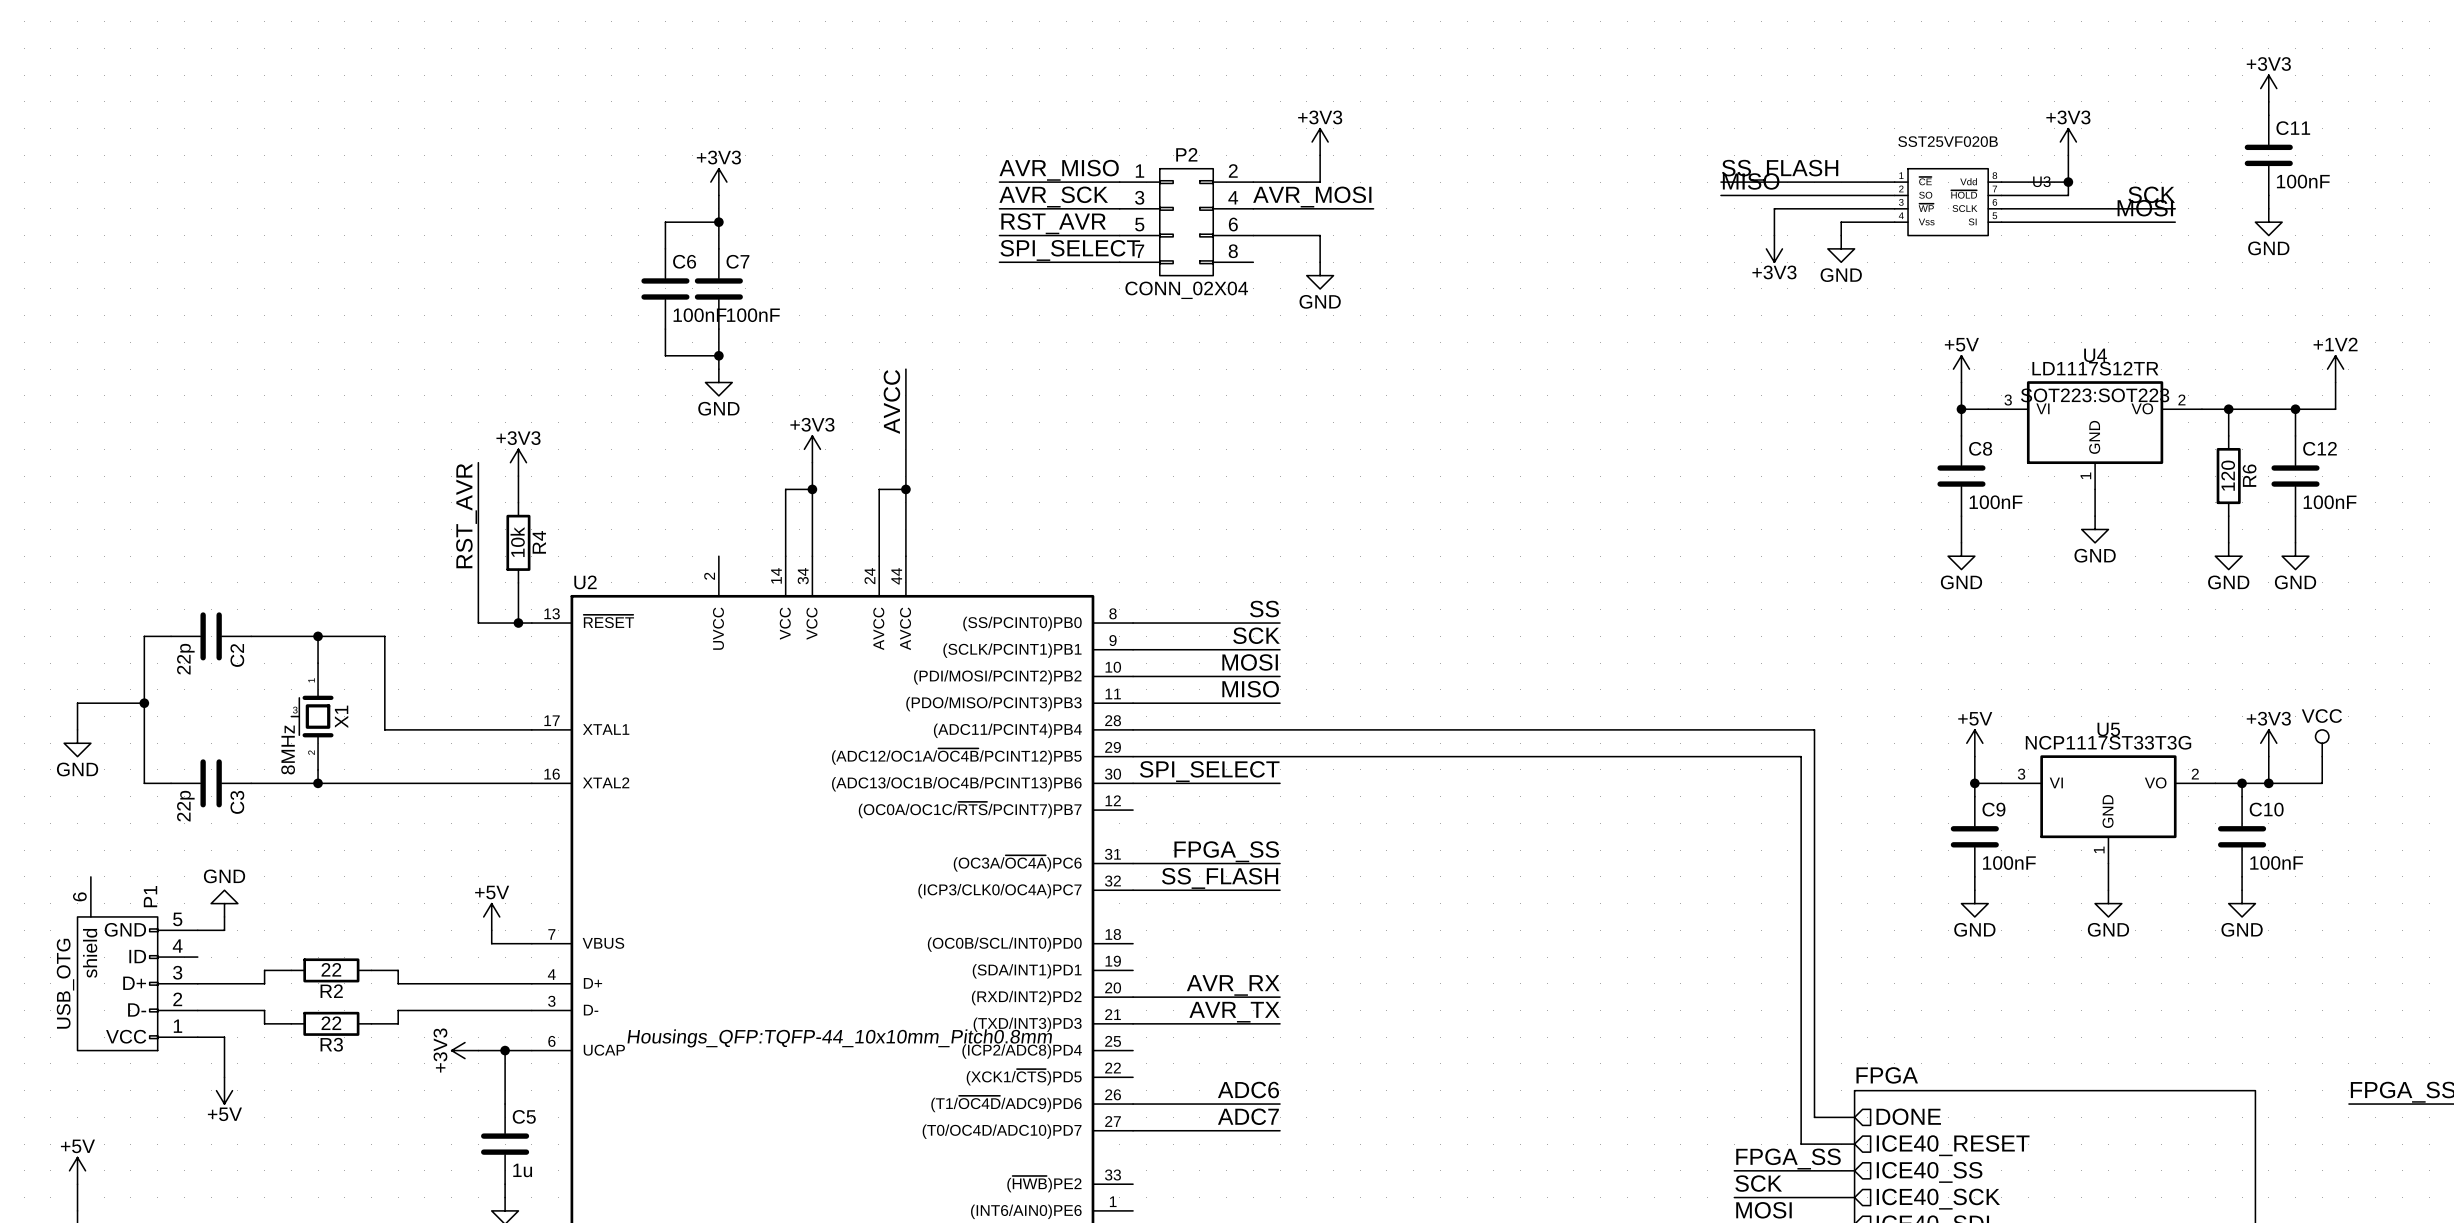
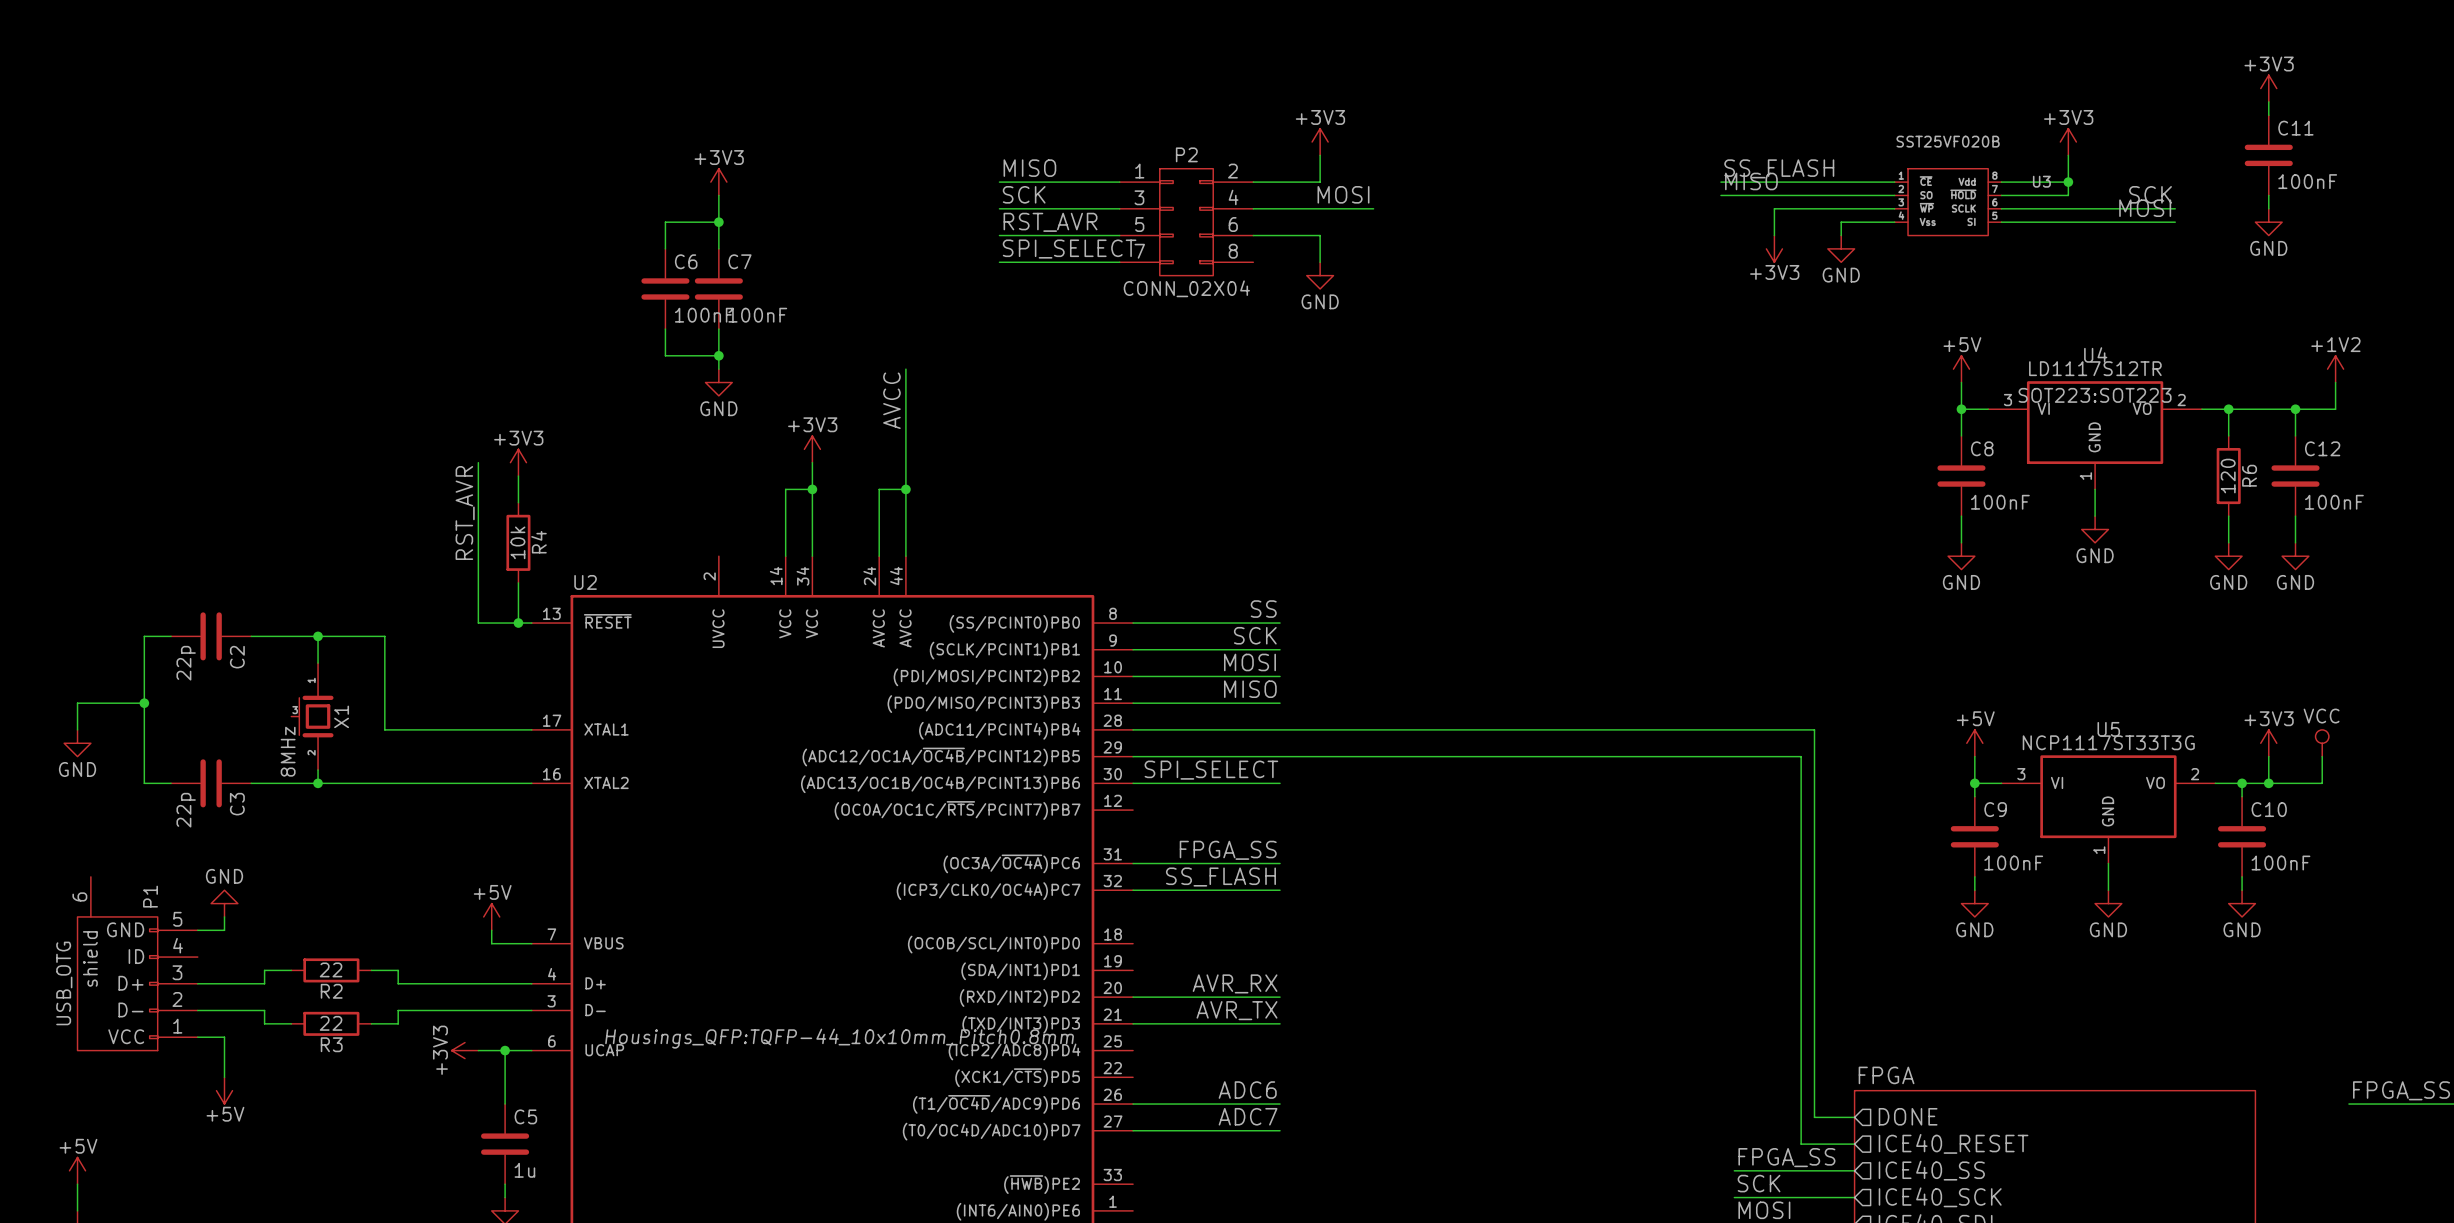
label: AVR_MISO (1059, 170) -> MISO (1029, 168)
label: AVR_SCK (1053, 197) -> SCK (1024, 194)
label: AVR_MOSI (1312, 197) -> MOSI (1343, 194)

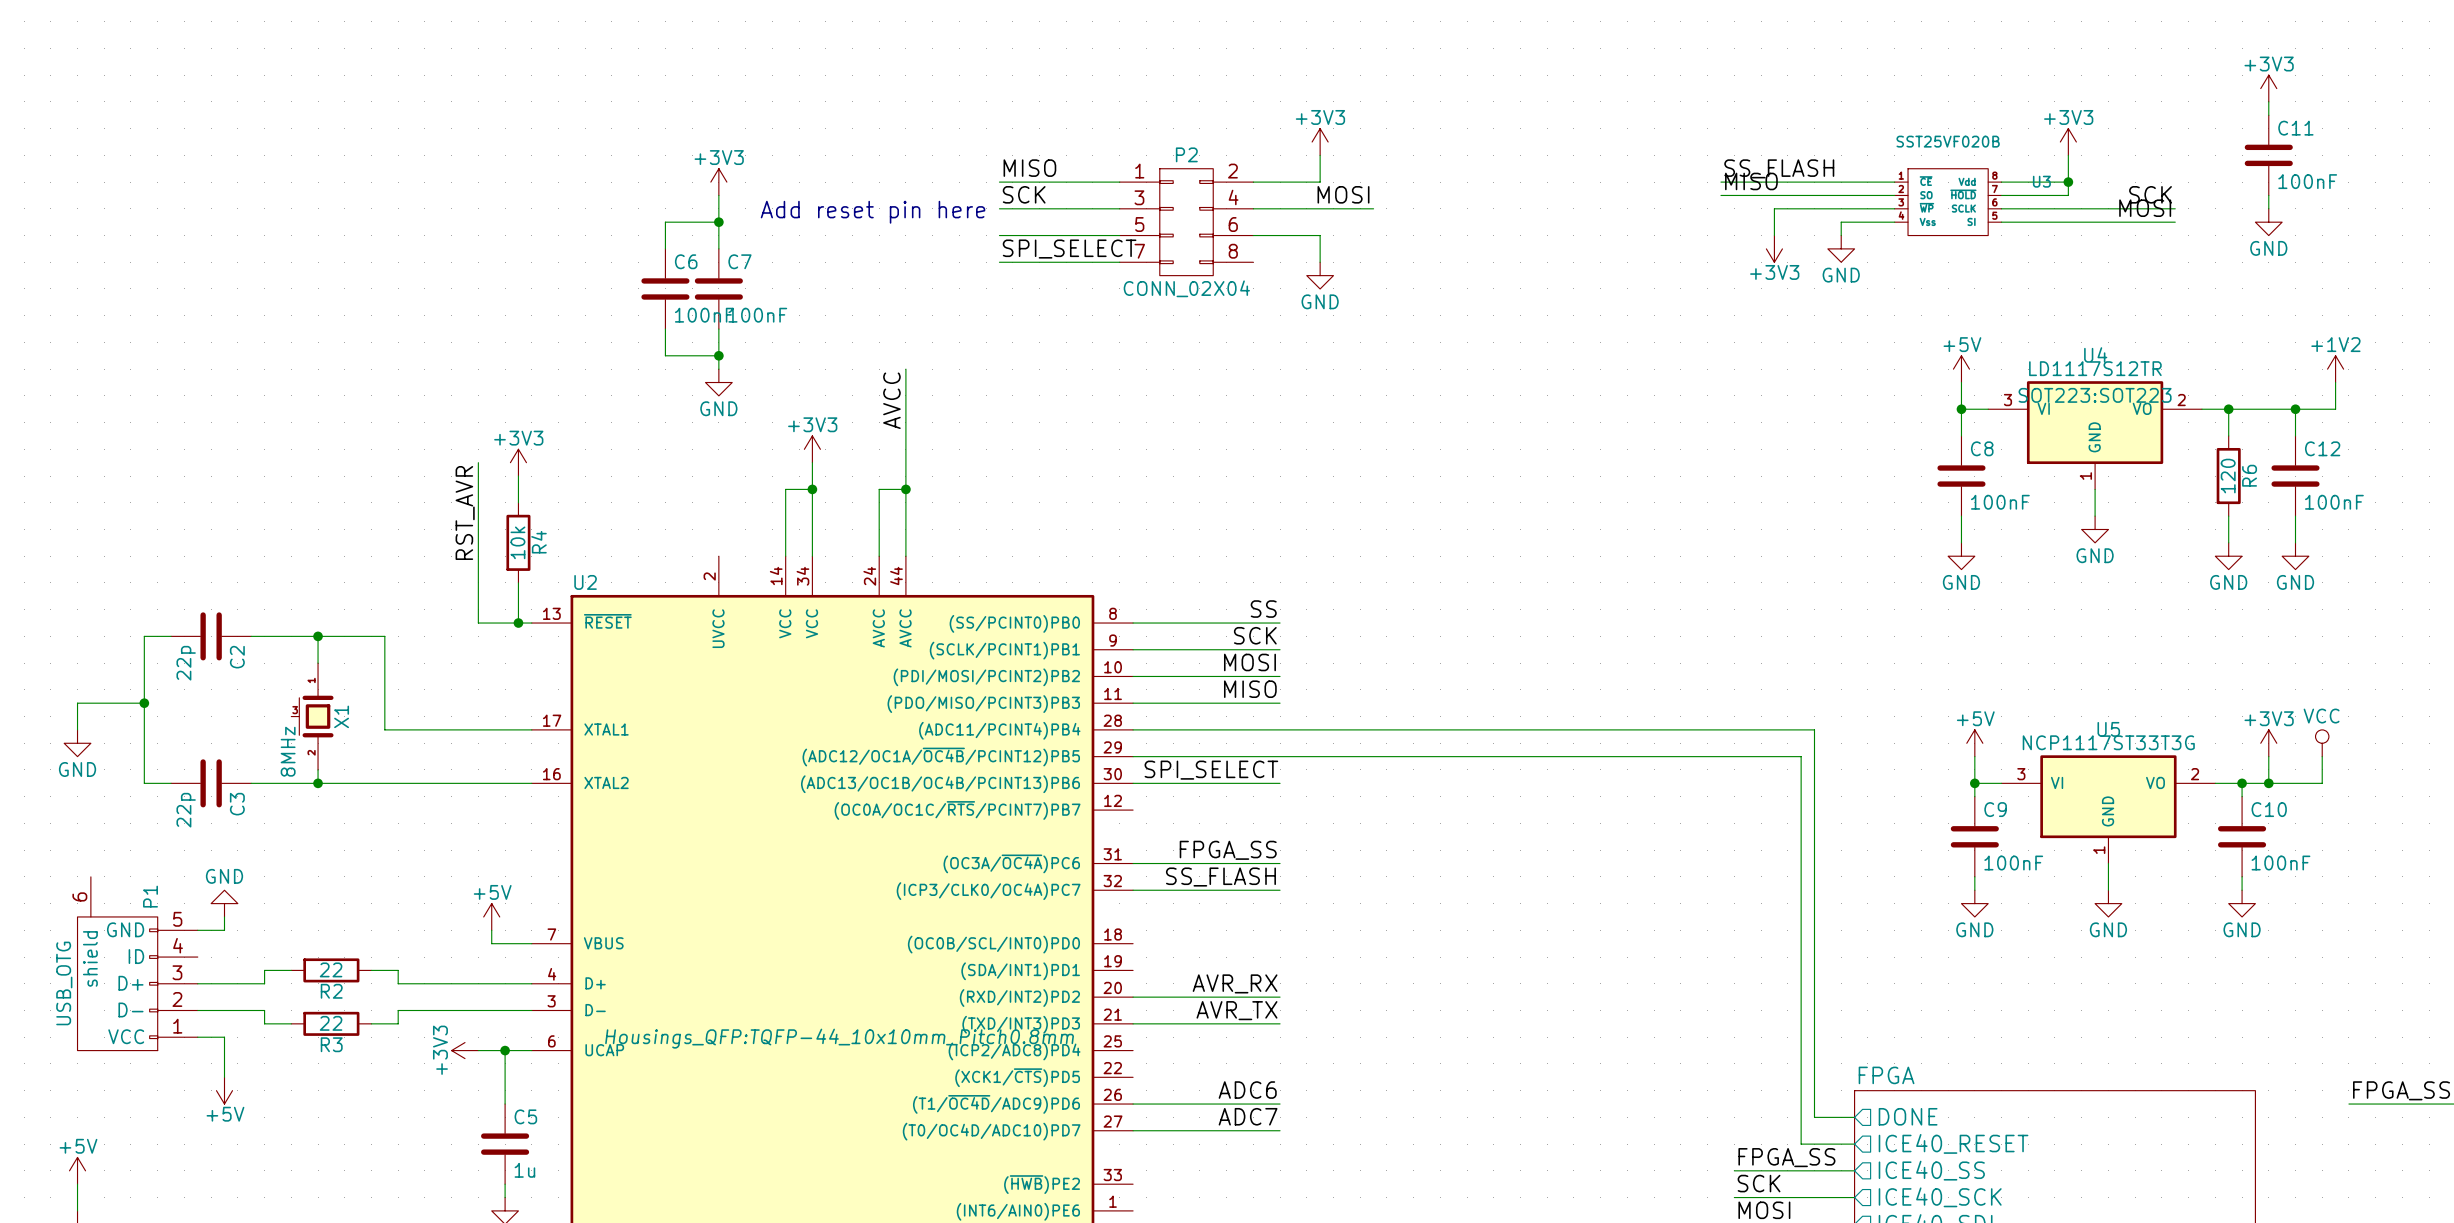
text: none -> Add reset pin here (873, 212)
label: RST_AVR (1050, 222) -> none

